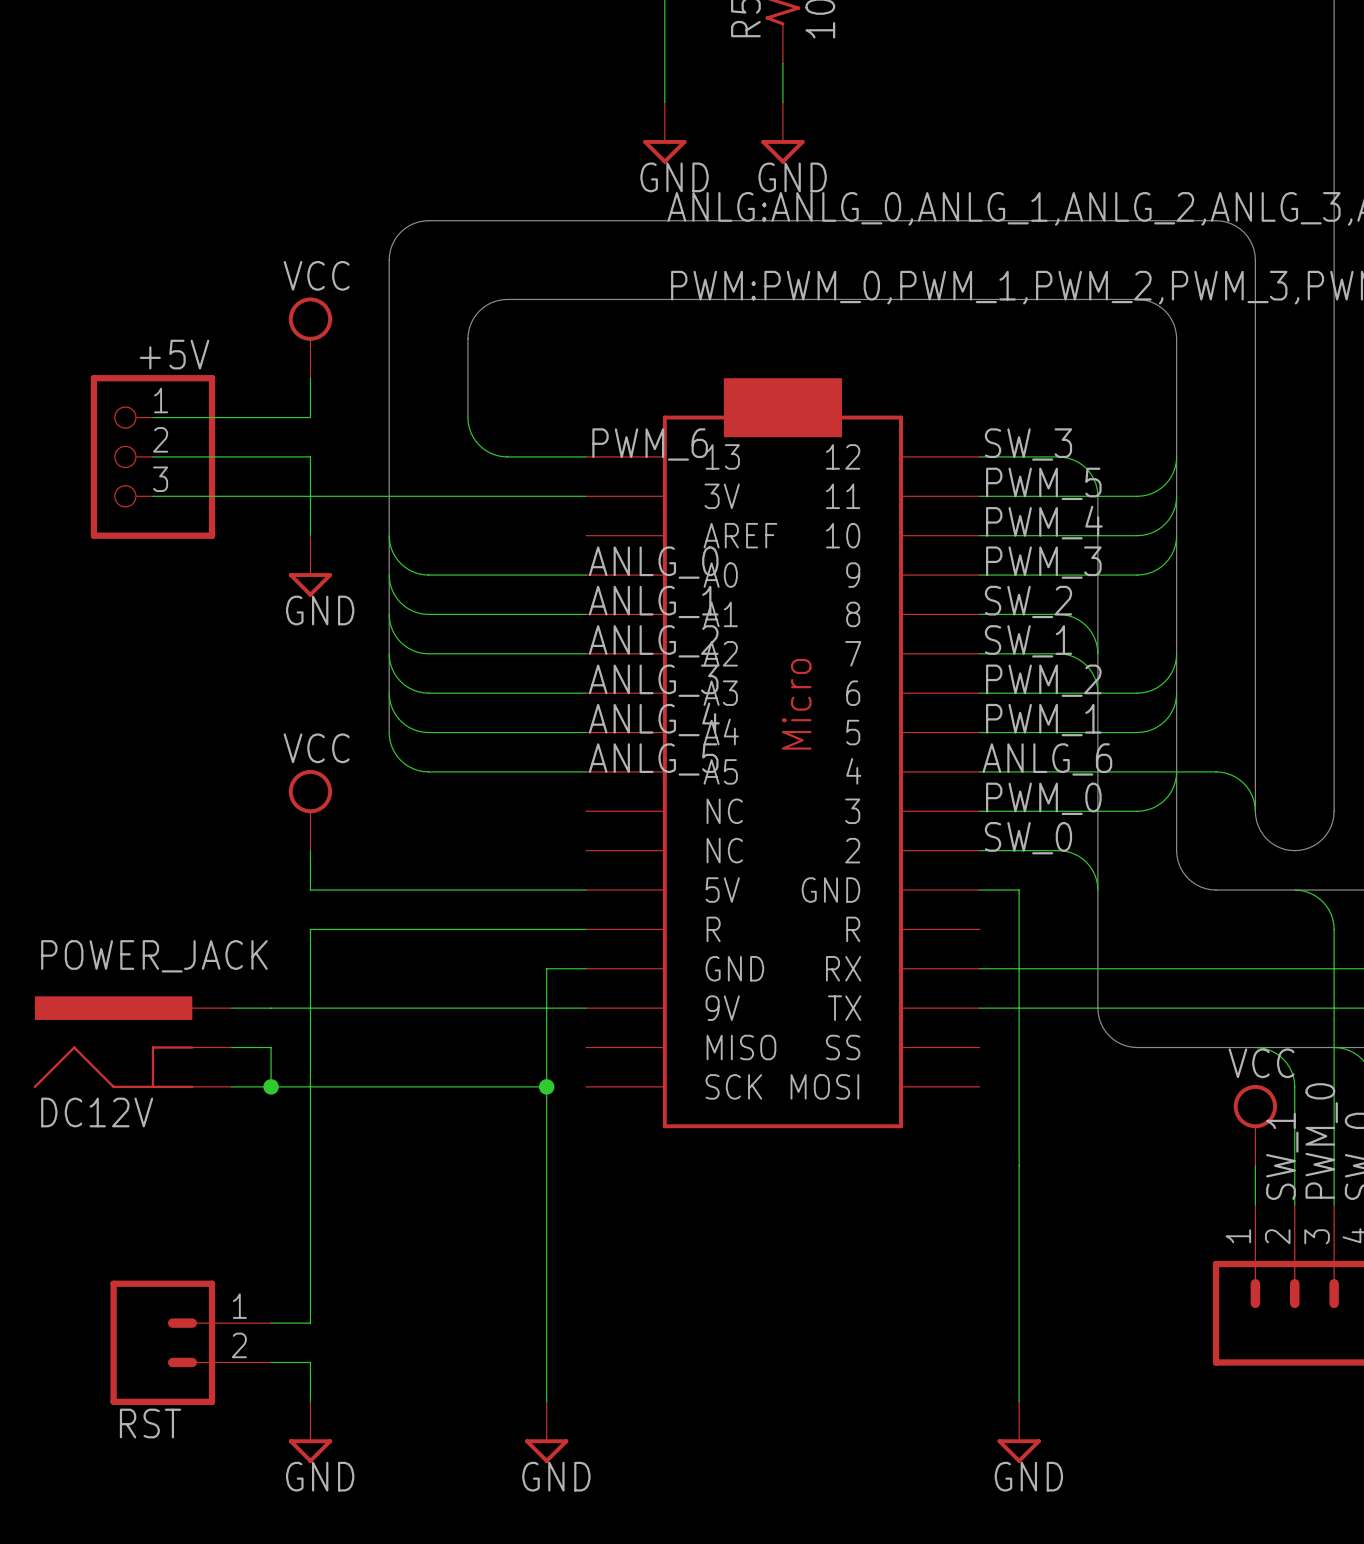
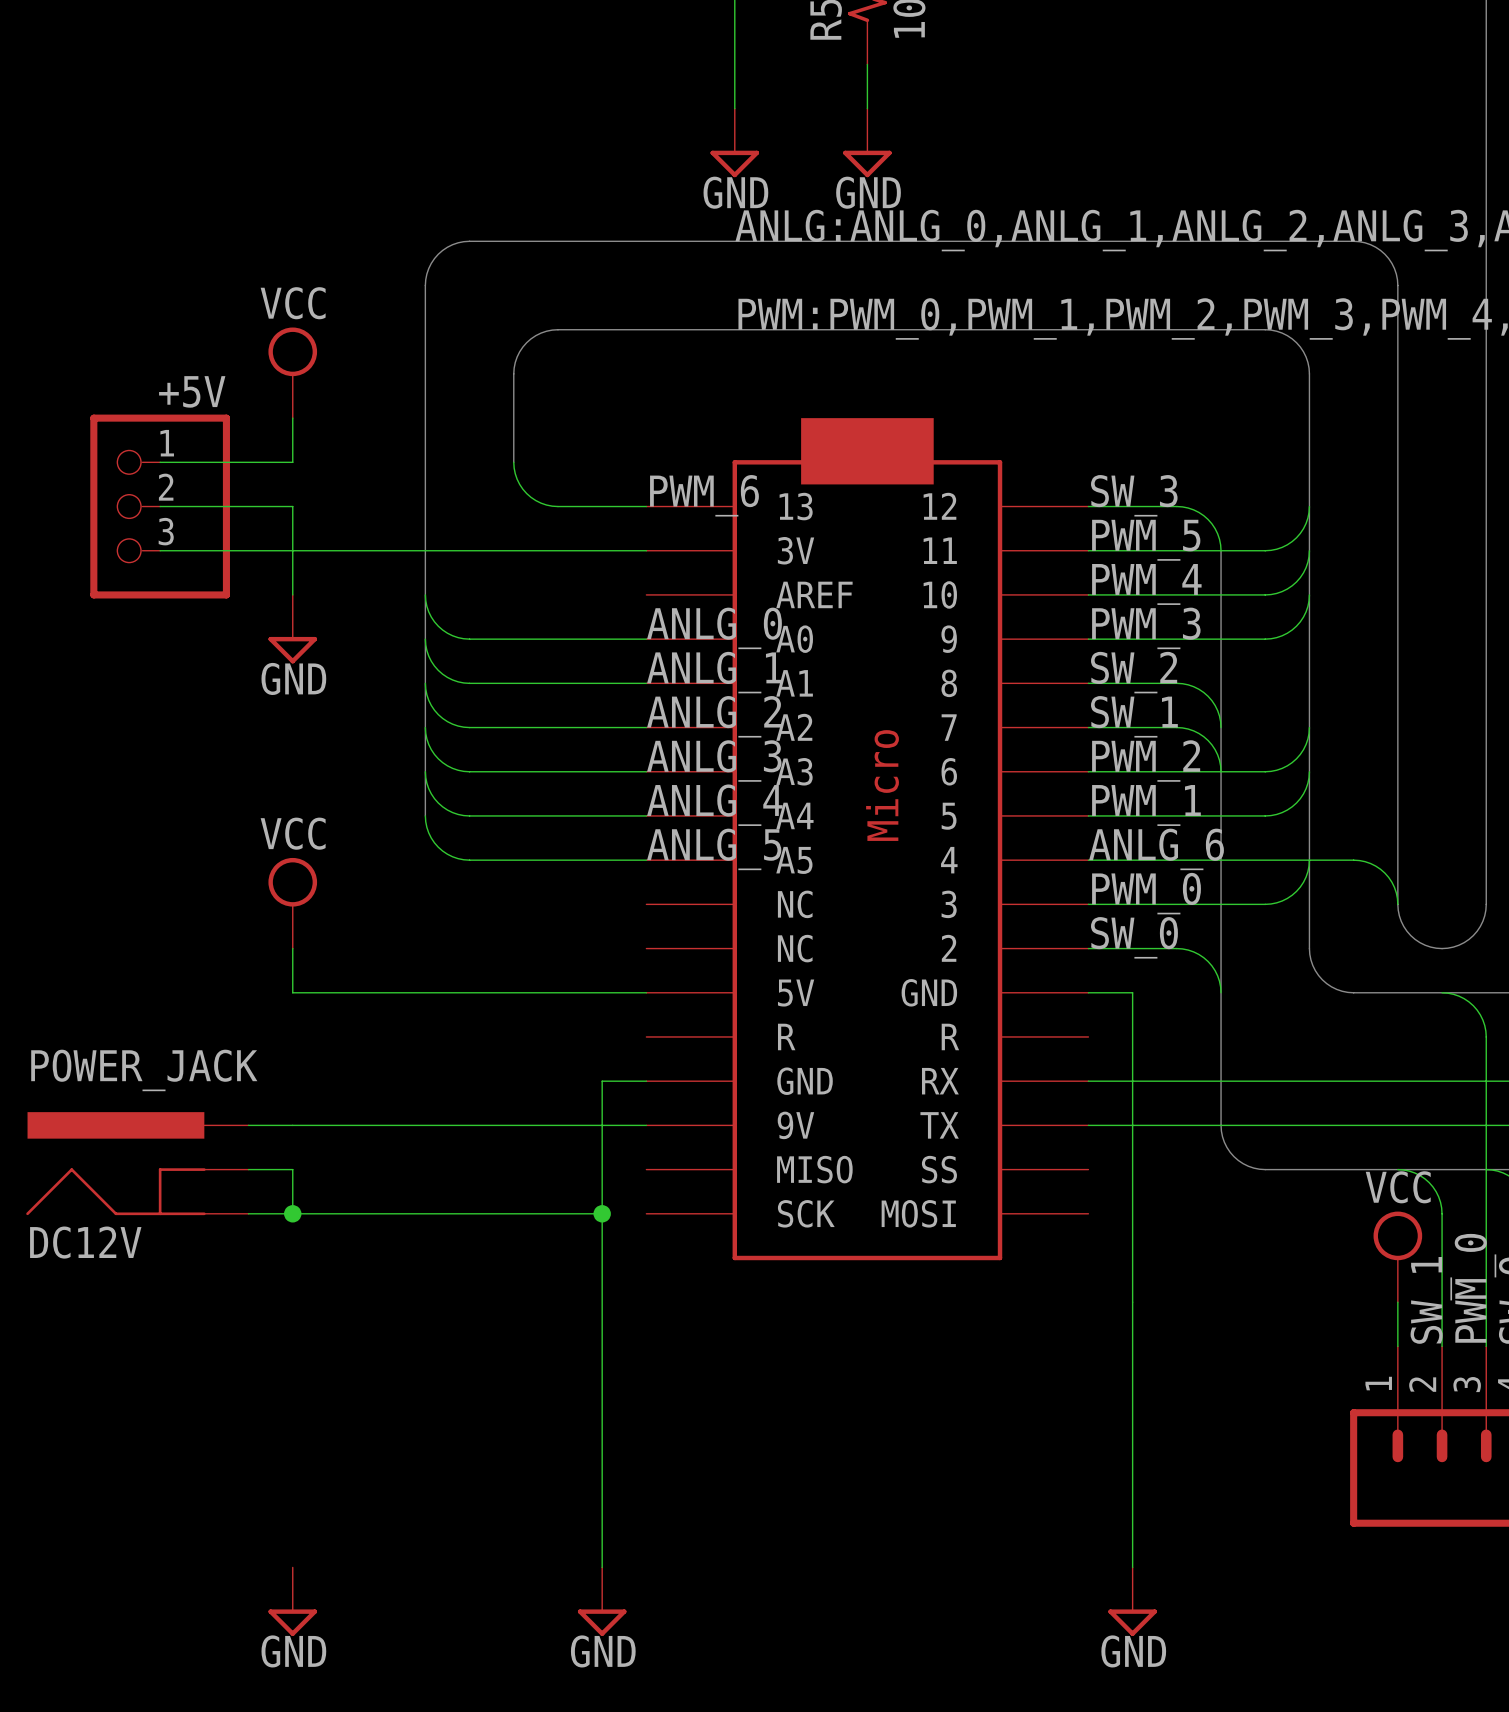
power symbol position: VCC (310, 337) -> VCC (292, 372)
wire: (310, 378) (310, 417) (271, 417) -> (292, 418) (292, 462)
wire: (271, 456) (310, 456) (310, 535) -> (292, 506) (292, 594)
power symbol position: GND (310, 566) -> GND (292, 629)
power symbol position: VCC (310, 810) -> VCC (292, 903)
wire: (310, 850) (310, 890) -> (292, 948) (292, 992) (336, 992)
wire: (586, 929) (310, 929) (310, 1323) (271, 1323) -> none
RST: (190, 1342) -> none
wire: (271, 1362) (310, 1362) (310, 1401) -> none
power symbol position: GND (310, 1432) -> GND (292, 1601)

